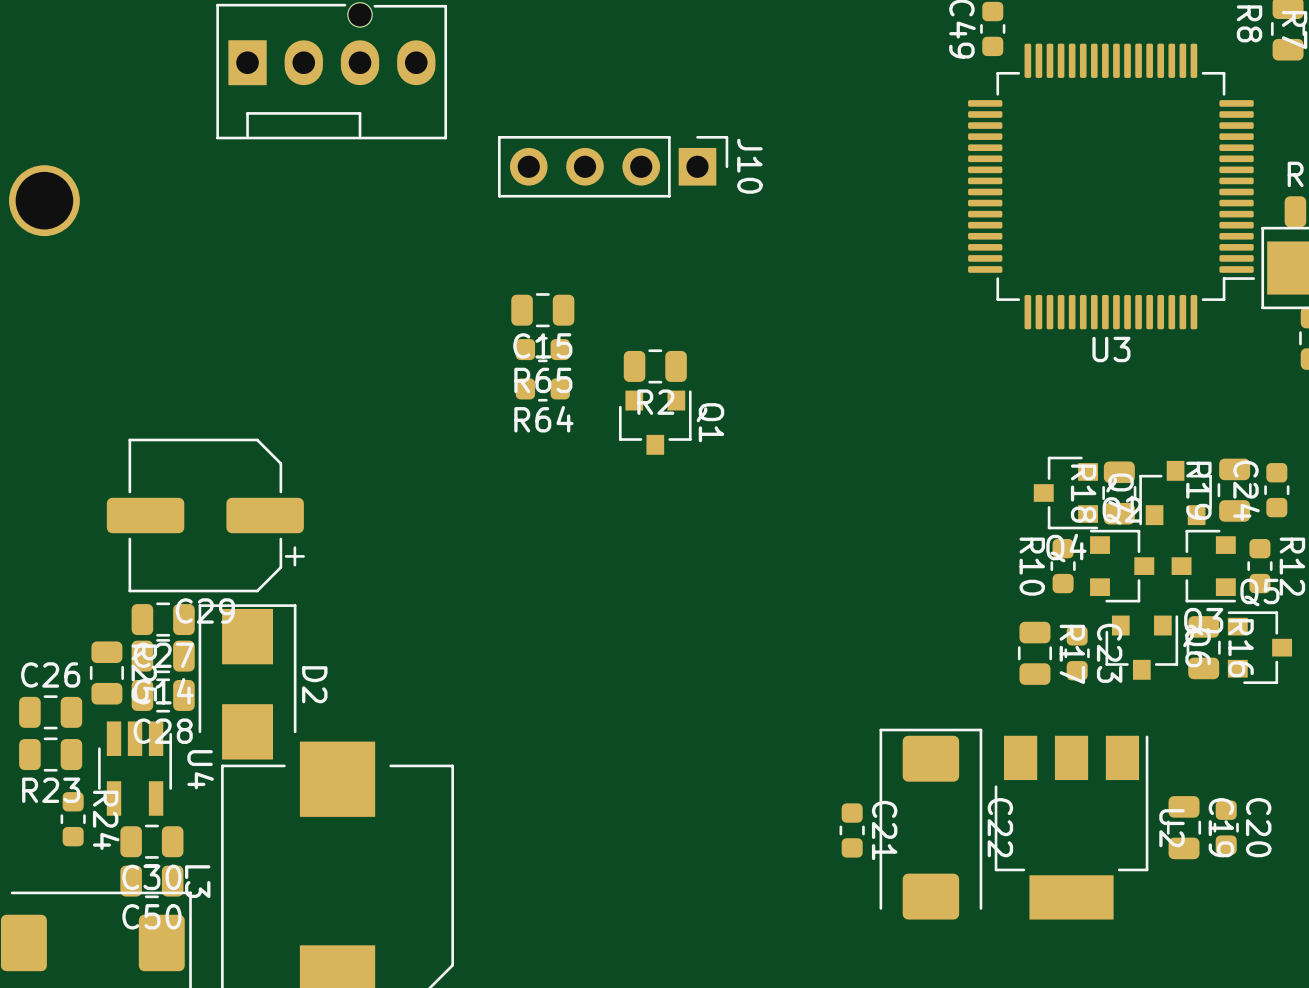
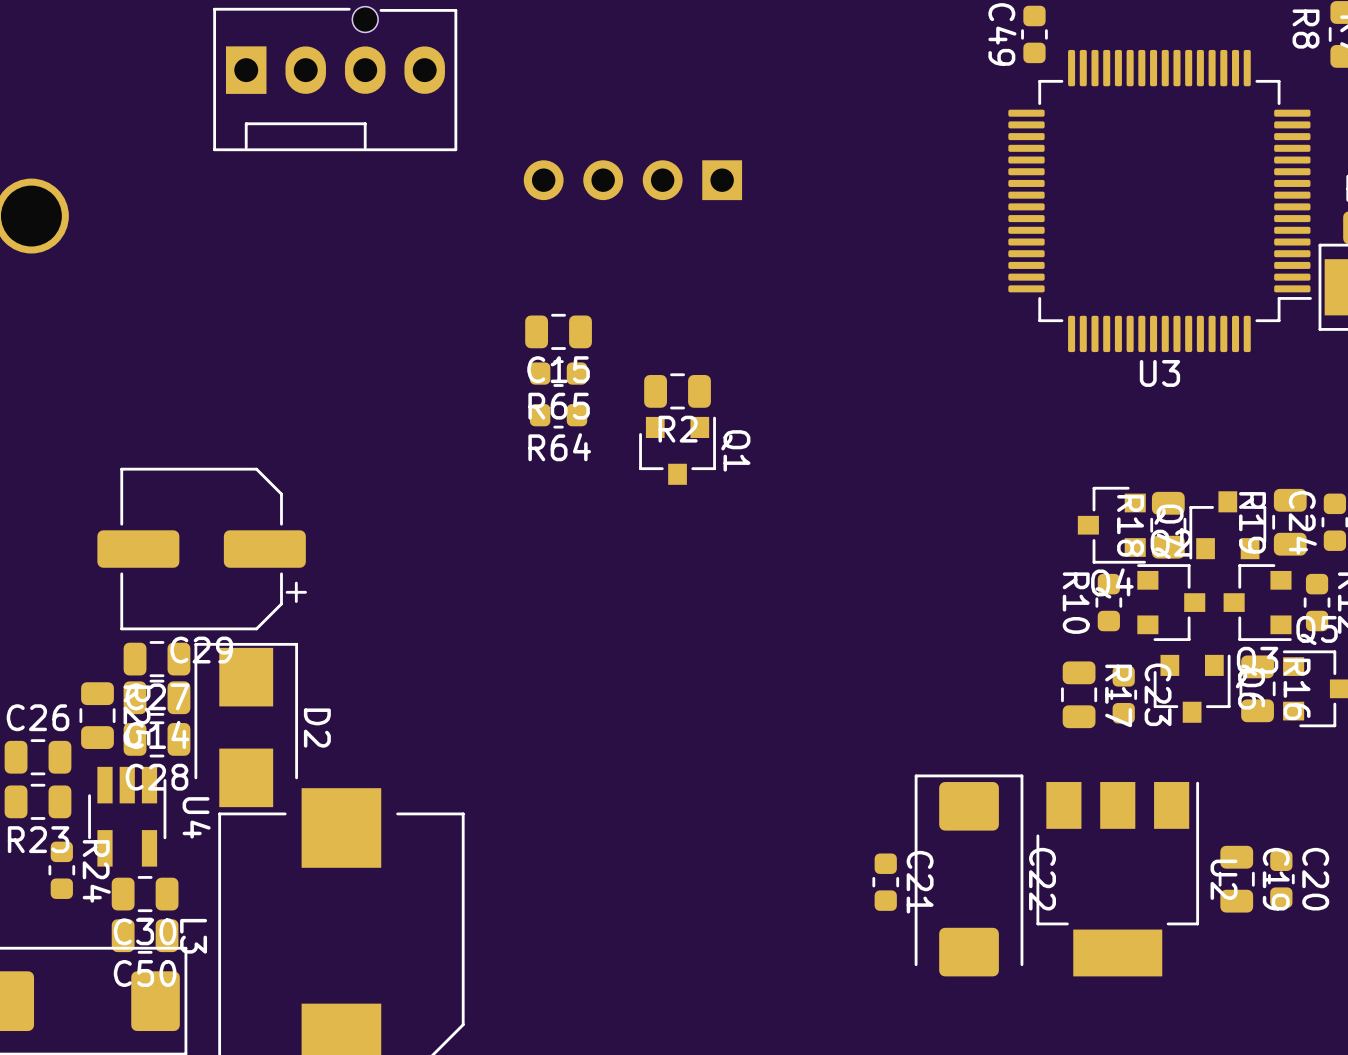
J10 side: bottom (613, 166) -> top (632, 180)

